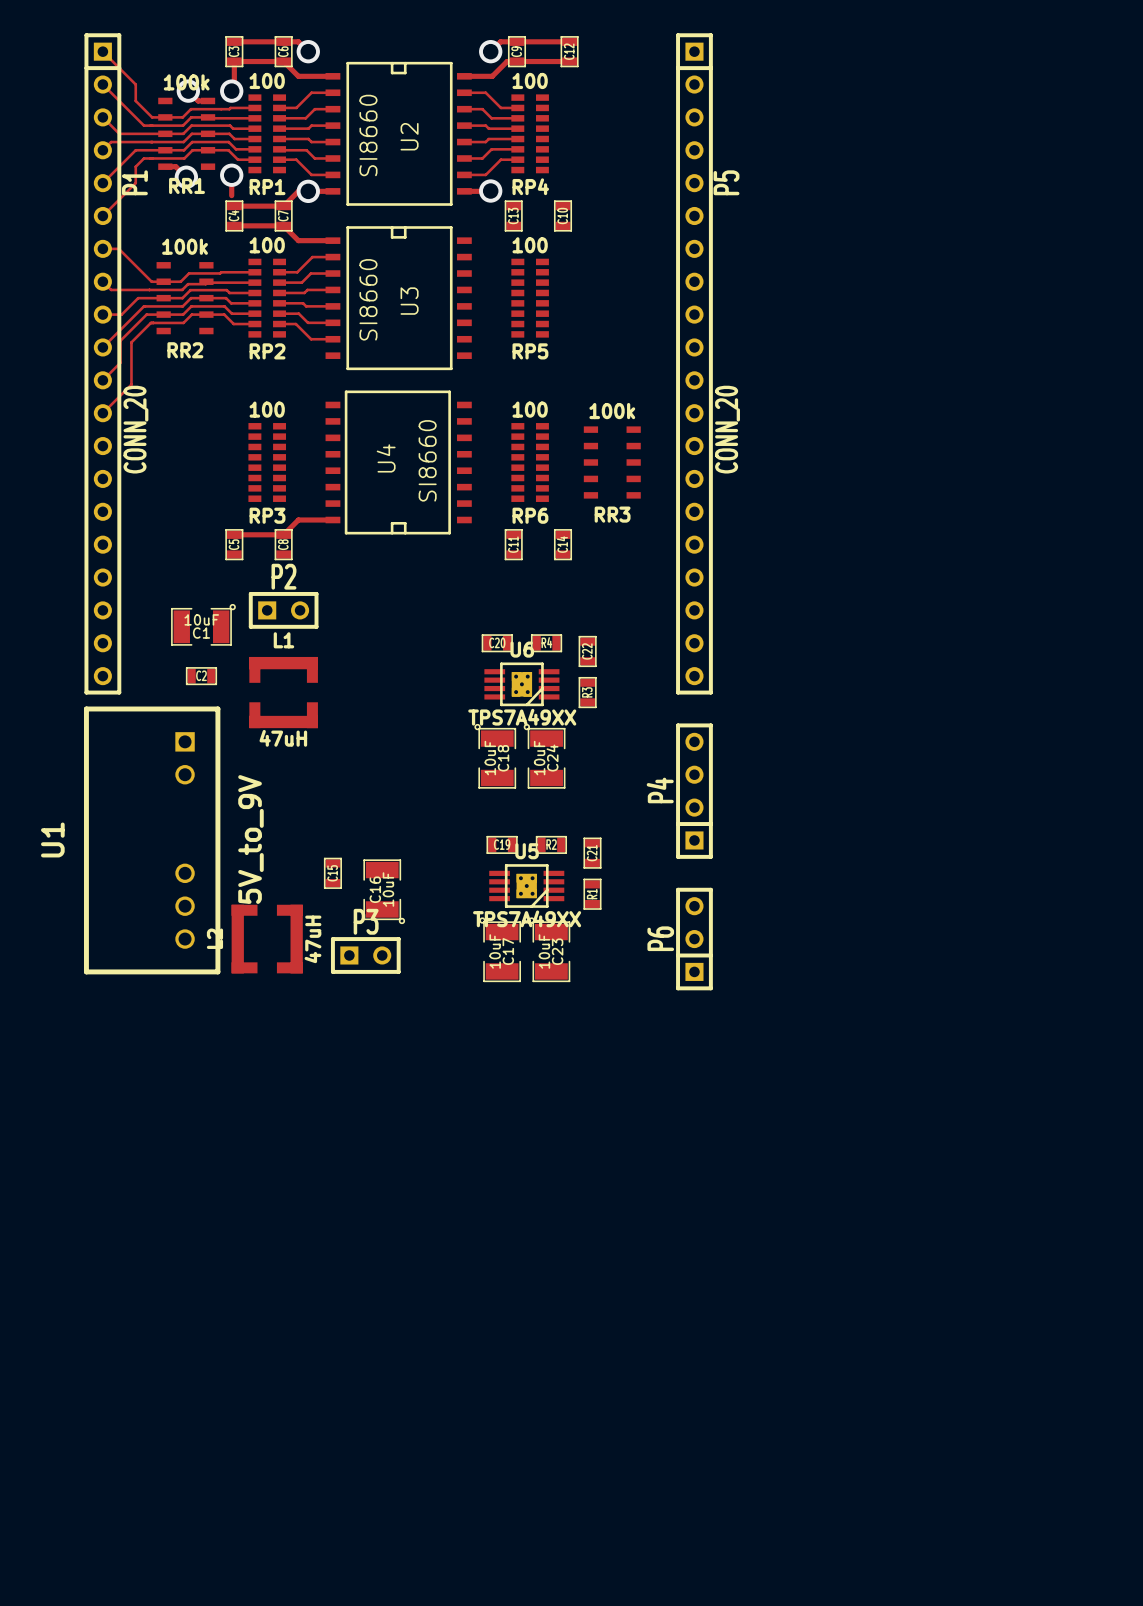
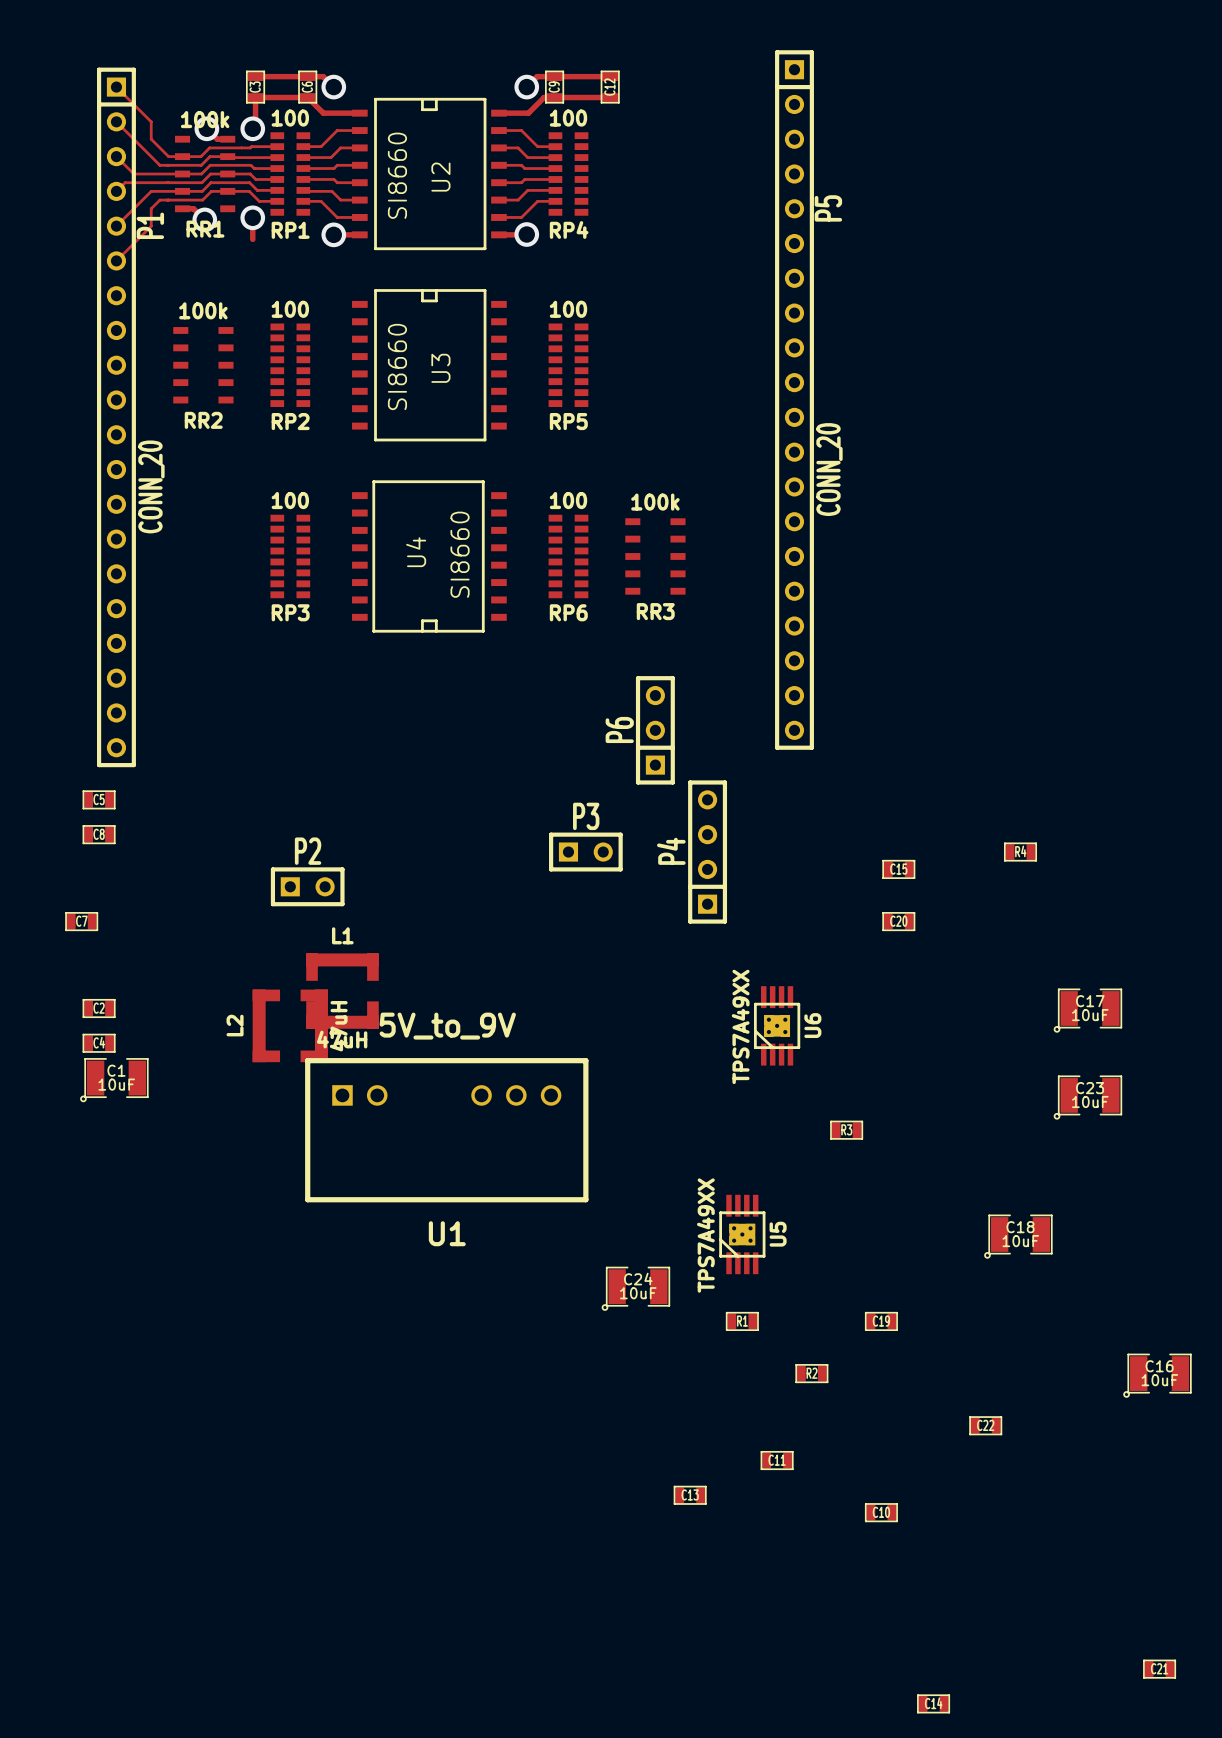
track: (308, 191) (298, 191) (283, 206) (234, 206) -> none
C4 rotation: 0° (234, 216) -> 90° clockwise (99, 1043)
C4 position: (234, 216) -> (99, 1043)
C7 rotation: 0° (283, 216) -> 90° clockwise (81, 921)
C7 position: (283, 216) -> (81, 921)
C13 rotation: 0° (513, 216) -> 90° clockwise (690, 1495)
C13 position: (513, 216) -> (690, 1495)
C10 rotation: 0° (563, 216) -> 90° clockwise (881, 1512)
C10 position: (563, 216) -> (881, 1512)
track: (234, 225) (283, 225) (298, 240) (332, 240) -> none
track: (102, 248) (118, 248) (151, 281) (180, 281) (189, 273) (254, 272) -> none
track: (332, 257) (312, 257) (297, 272) (279, 272) -> none
track: (332, 273) (310, 273) (301, 282) (279, 282) -> none
track: (102, 281) (111, 289) (182, 289) (188, 284) (254, 282) -> none
track: (332, 289) (279, 292) -> none
track: (254, 293) (229, 293) (226, 290) (190, 290) (182, 298) (138, 298) (121, 314) (102, 314) -> none
RR2 position: (185, 298) -> (203, 365)
RP2 position: (267, 298) -> (290, 365)
U3 position: (398, 298) -> (429, 365)
RP5 position: (530, 298) -> (568, 365)
track: (254, 303) (231, 303) (226, 298) (190, 298) (182, 306) (143, 306) (102, 347) -> none
track: (279, 303) (303, 303) (306, 306) (332, 306) -> none
track: (254, 313) (231, 313) (224, 306) (191, 306) (183, 314) (146, 314) (120, 340) (120, 362) (102, 380) -> none
track: (279, 313) (298, 313) (307, 322) (332, 322) -> none
track: (254, 324) (233, 324) (224, 314) (191, 314) (183, 322) (150, 322) (131, 342) (131, 384) (102, 413) -> none
track: (279, 324) (295, 324) (311, 339) (332, 339) -> none
P5 position: (694, 363) -> (794, 400)
RP3 position: (267, 462) -> (290, 556)
U4 position: (398, 462) -> (429, 556)
RP6 position: (530, 462) -> (568, 556)
RR3 position: (612, 462) -> (655, 556)
track: (332, 520) (298, 520) (283, 534) (234, 534) -> none
C5 rotation: 0° (234, 544) -> 90° clockwise (99, 799)
C5 position: (234, 544) -> (99, 799)
C8 rotation: 0° (283, 544) -> 90° clockwise (99, 834)
C8 position: (283, 544) -> (99, 834)
C11 rotation: 0° (513, 544) -> 90° clockwise (777, 1460)
C11 position: (513, 544) -> (777, 1460)
C14 rotation: 0° (563, 544) -> 90° clockwise (933, 1703)
C14 position: (563, 544) -> (933, 1703)
P2 position: (283, 610) -> (307, 886)
C1 rotation: 0° (203, 624) -> 180° (114, 1080)
C1 position: (203, 624) -> (114, 1080)
C20 position: (497, 643) -> (898, 921)
R4 position: (546, 643) -> (1020, 852)
C22 rotation: 0° (587, 651) -> 90° clockwise (985, 1425)
C22 position: (587, 651) -> (985, 1425)
C2 position: (201, 676) -> (99, 1008)
U6 rotation: 0° (521, 684) -> 90° clockwise (777, 1025)
U6 position: (521, 684) -> (777, 1025)
L1 position: (283, 692) -> (342, 991)
R3 rotation: 0° (587, 692) -> 90° clockwise (846, 1130)
R3 position: (587, 692) -> (846, 1130)
C18 rotation: 0° (495, 756) -> 90° counterclockwise (1018, 1236)
C18 position: (495, 756) -> (1018, 1236)
C24 rotation: 0° (544, 756) -> 90° counterclockwise (635, 1288)
C24 position: (544, 756) -> (635, 1288)
P4 position: (694, 791) -> (707, 852)
U1 rotation: 0° (152, 840) -> 90° counterclockwise (446, 1130)
U1 position: (152, 840) -> (446, 1130)
C19 position: (502, 844) -> (881, 1321)
R2 position: (551, 844) -> (811, 1373)
C21 rotation: 0° (592, 853) -> 90° clockwise (1159, 1669)
C21 position: (592, 853) -> (1159, 1669)
C15 rotation: 0° (332, 873) -> 90° clockwise (898, 869)
C15 position: (332, 873) -> (898, 869)
U5 rotation: 0° (526, 886) -> 90° clockwise (742, 1234)
U5 position: (526, 886) -> (742, 1234)
C16 rotation: 0° (384, 891) -> 90° clockwise (1157, 1375)
C16 position: (384, 891) -> (1157, 1375)
R1 rotation: 0° (592, 894) -> 90° clockwise (742, 1321)
R1 position: (592, 894) -> (742, 1321)
P6 position: (694, 939) -> (655, 730)
C17 rotation: 0° (500, 949) -> 90° counterclockwise (1087, 1010)
C17 position: (500, 949) -> (1087, 1010)
C23 rotation: 0° (549, 949) -> 90° counterclockwise (1087, 1097)
C23 position: (549, 949) -> (1087, 1097)
P3 position: (365, 955) -> (585, 852)

